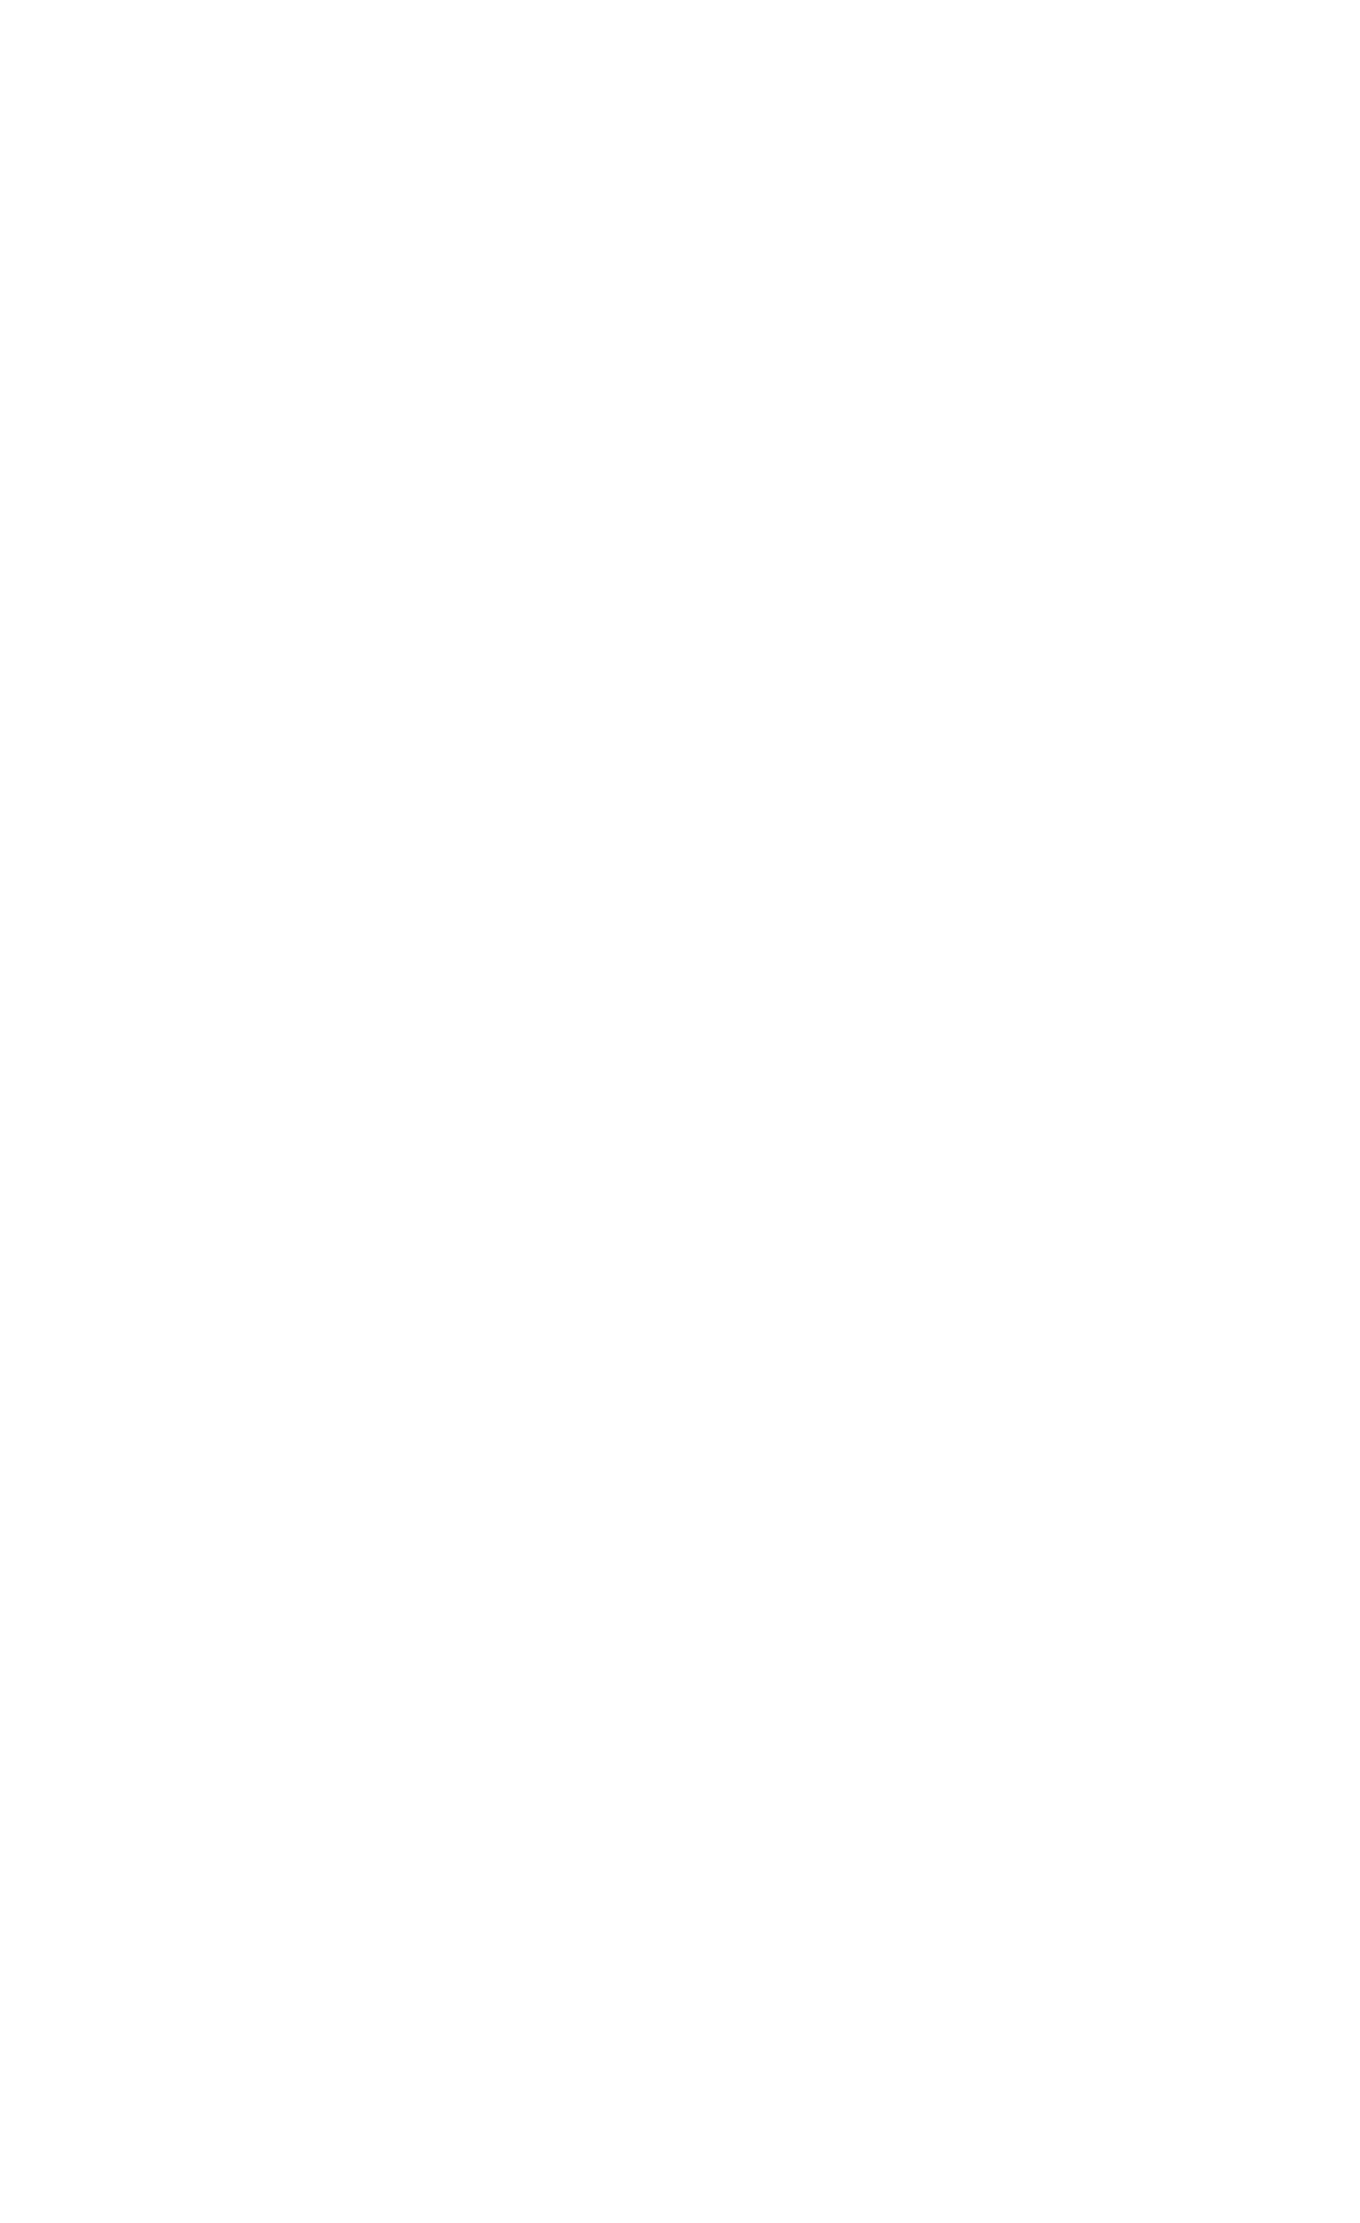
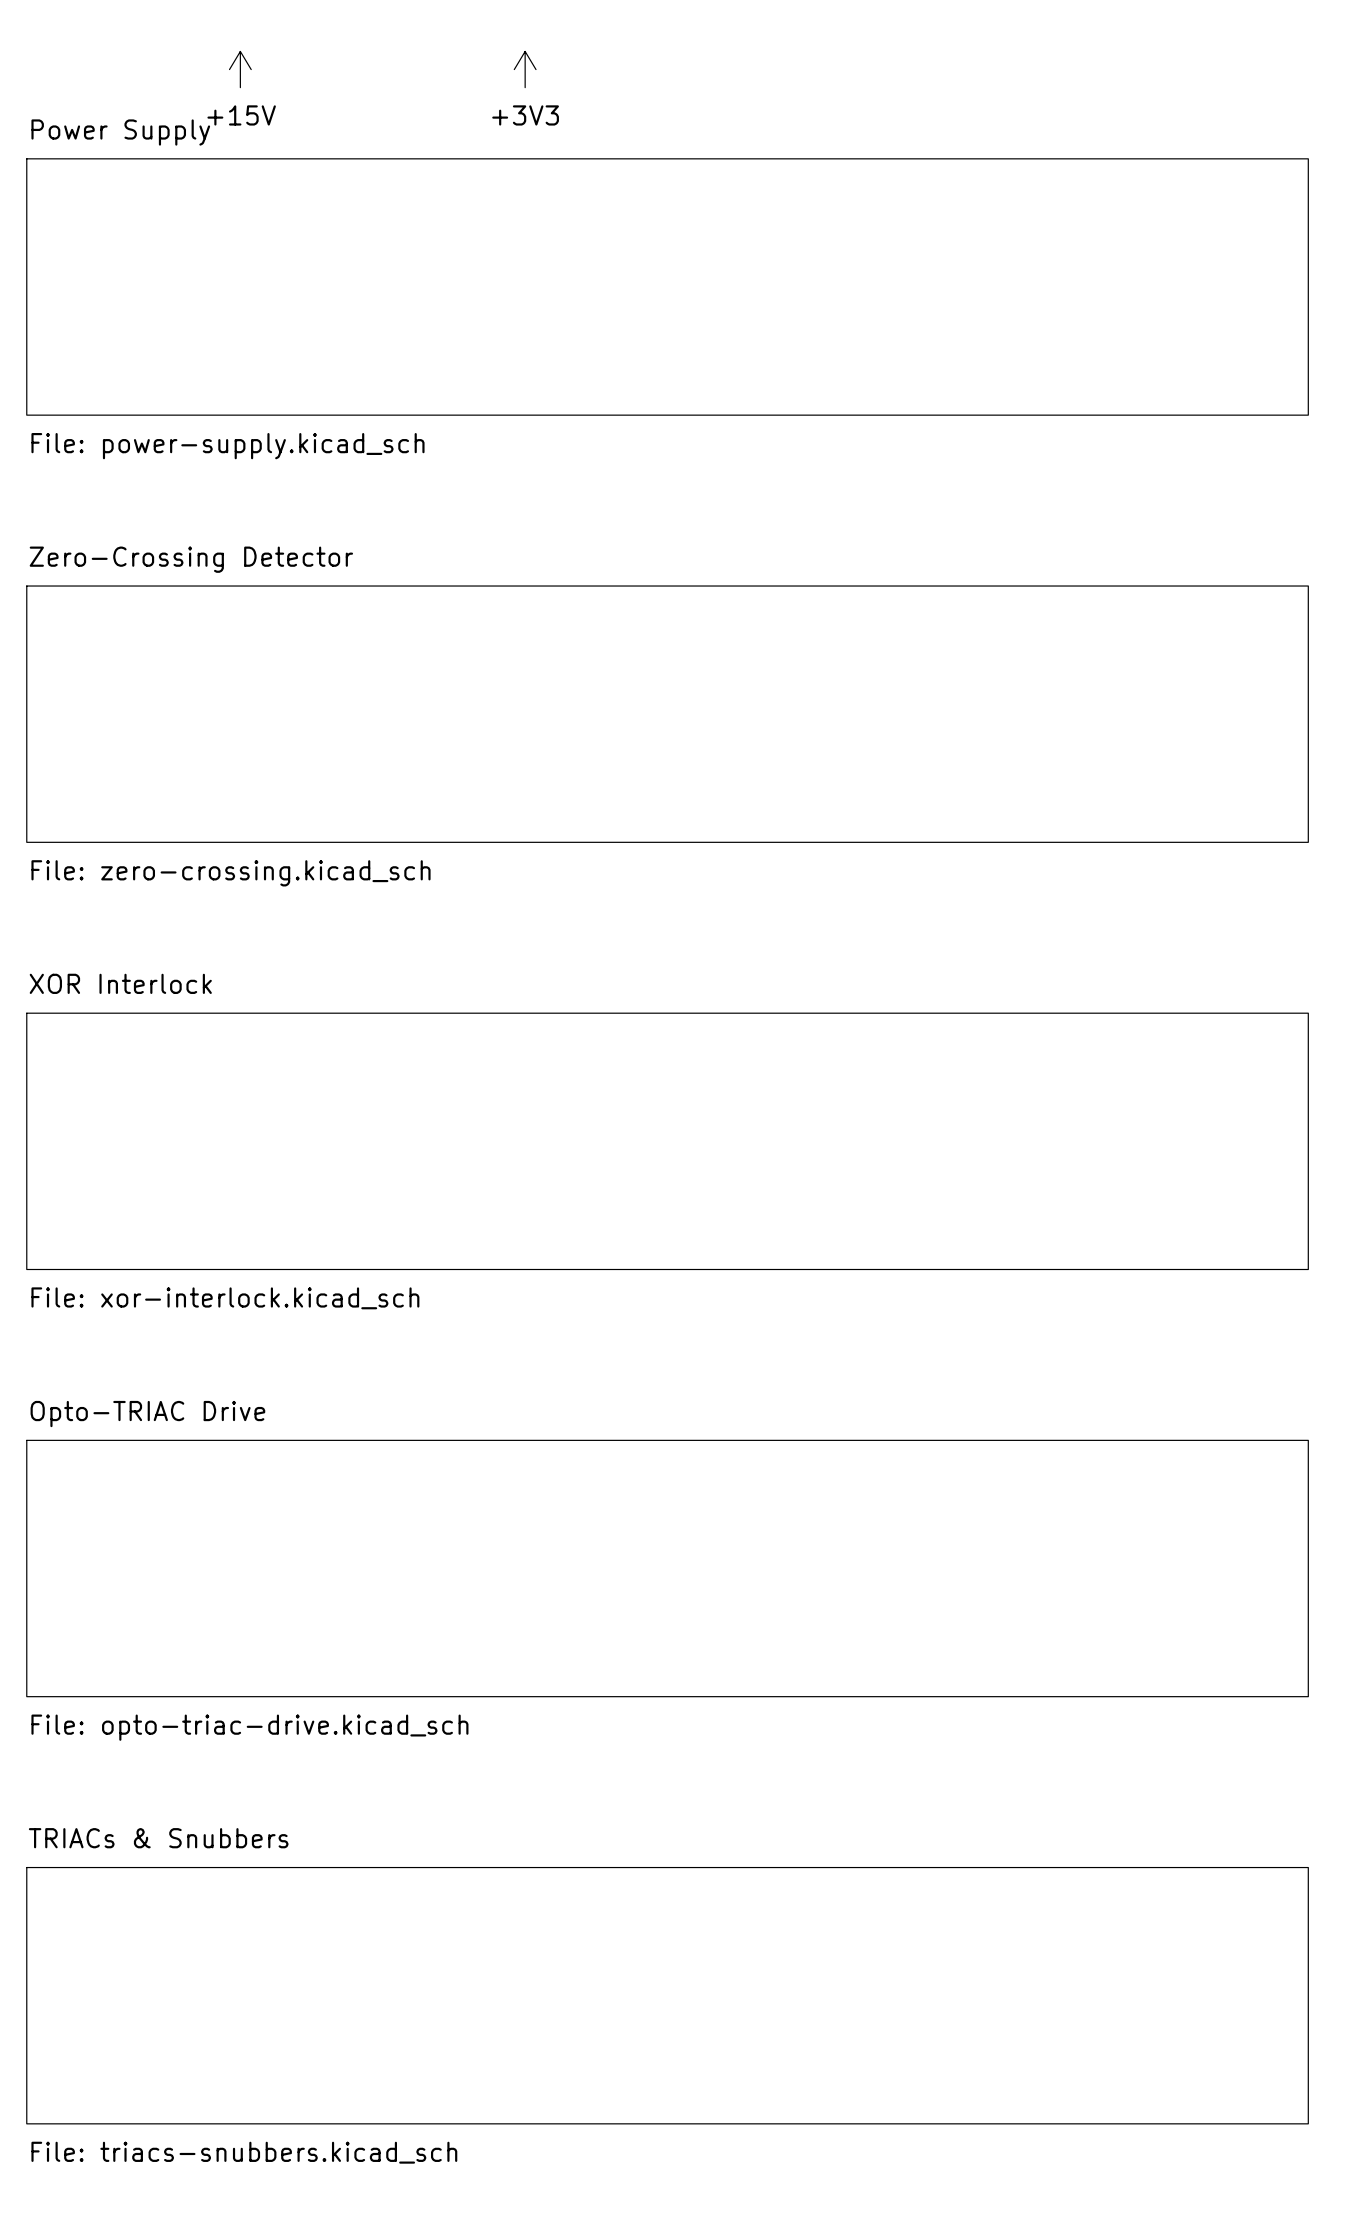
power symbol: none -> +15V (240, 69)
power symbol: none -> +3V3 (525, 69)
sheet Power Supply: none -> File: power-supply.kicad_sch (667, 286)
sheet Zero-Crossing Detector: none -> File: zero-crossing.kicad_sch (667, 714)
sheet XOR Interlock: none -> File: xor-interlock.kicad_sch (667, 1141)
sheet Opto-TRIAC Drive: none -> File: opto-triac-drive.kicad_sch (667, 1568)
sheet TRIACs & Snubbers: none -> File: triacs-snubbers.kicad_sch (667, 1995)

